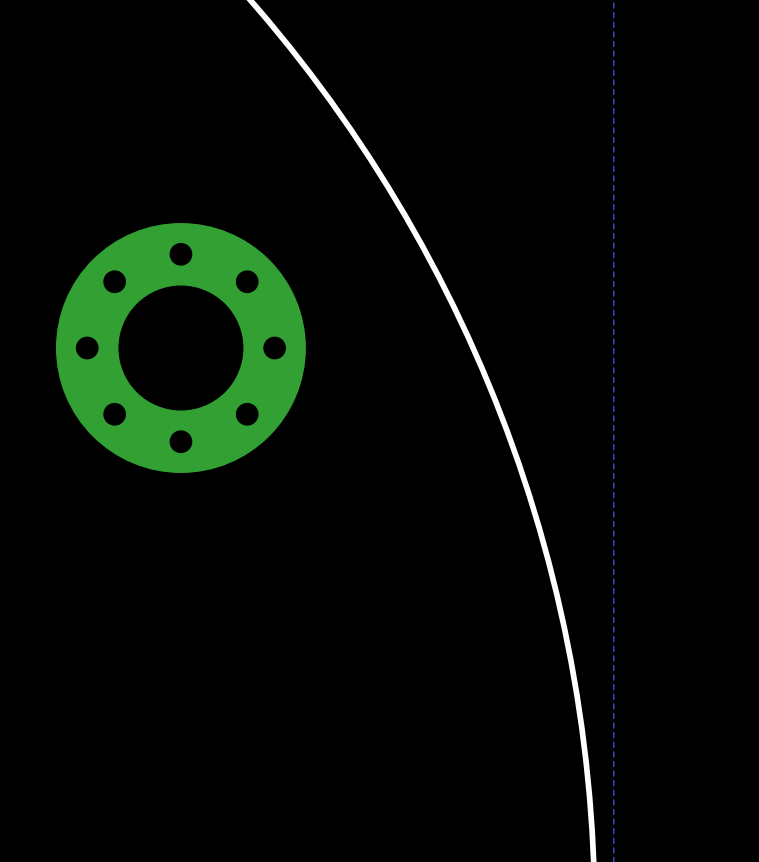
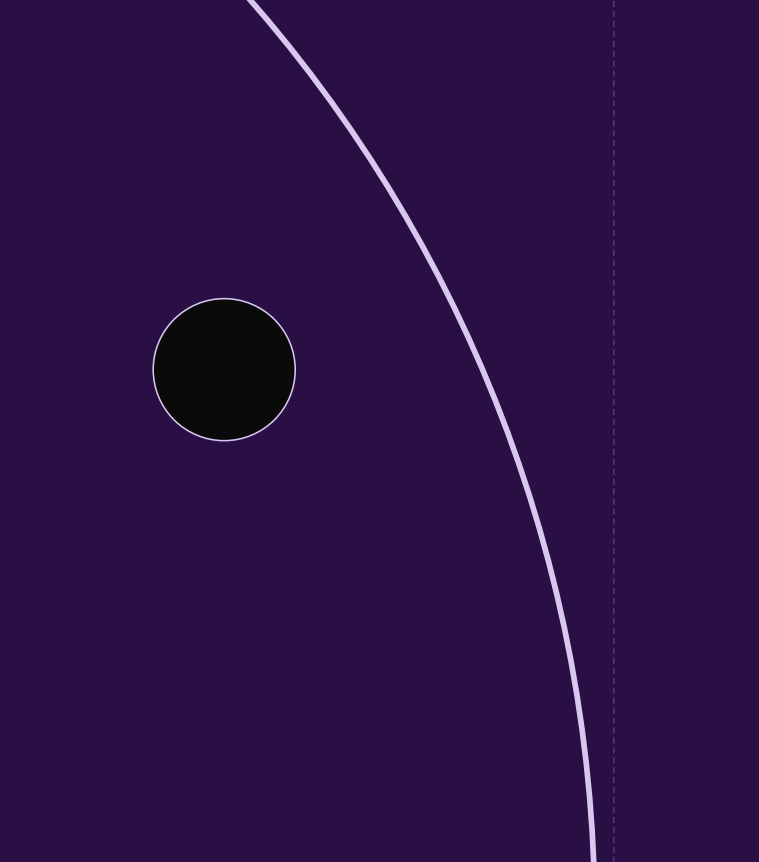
part footprint: [55, 223, 306, 473] -> [153, 298, 296, 441]

